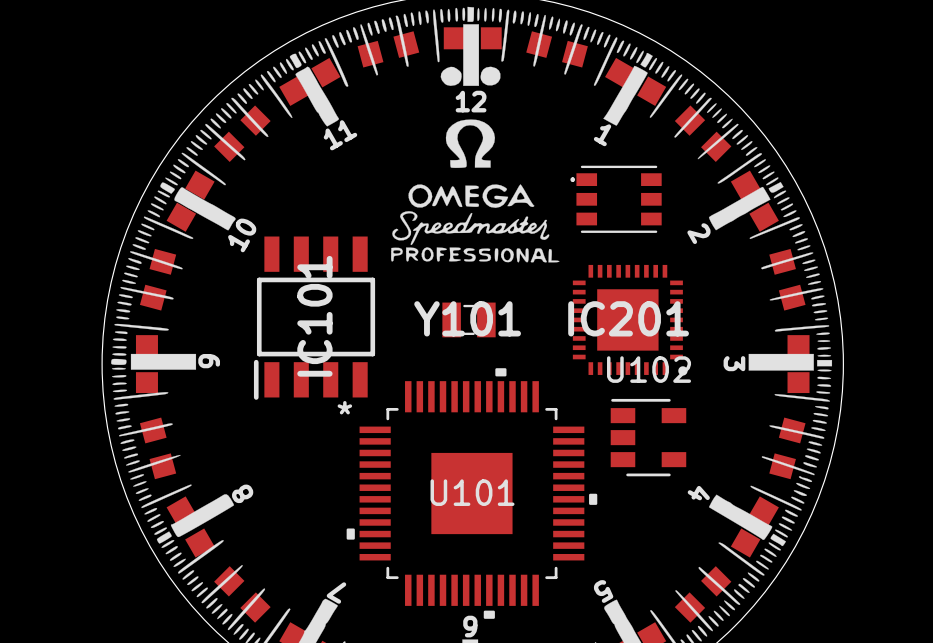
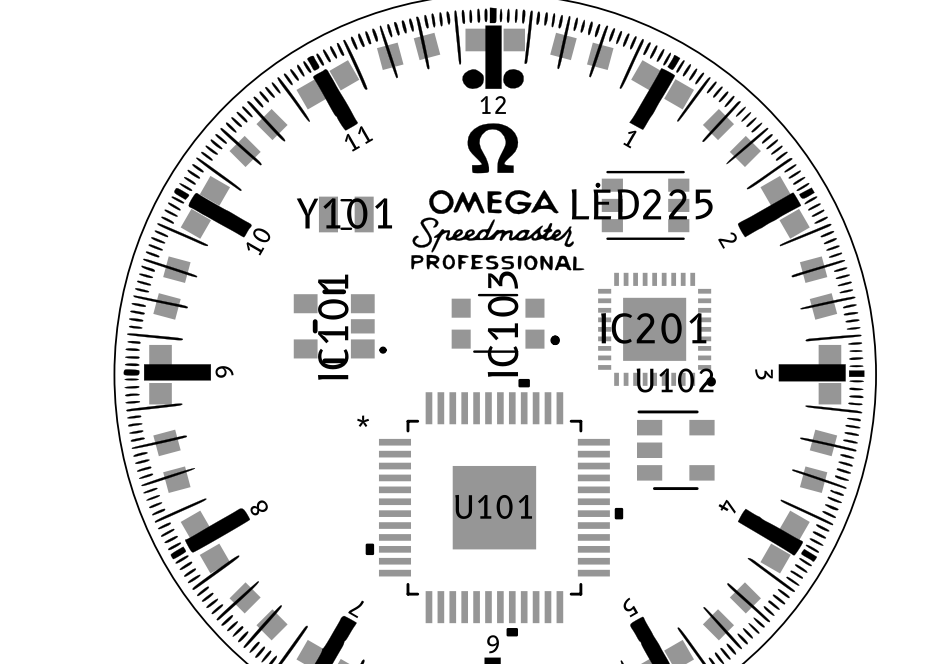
LED225 name: none -> LED225 (642, 204)
IC101 footprint: [253, 236, 376, 400] -> [293, 289, 387, 364]
IC103: none -> (505, 323)
Y101 position: (469, 319) -> (346, 214)

